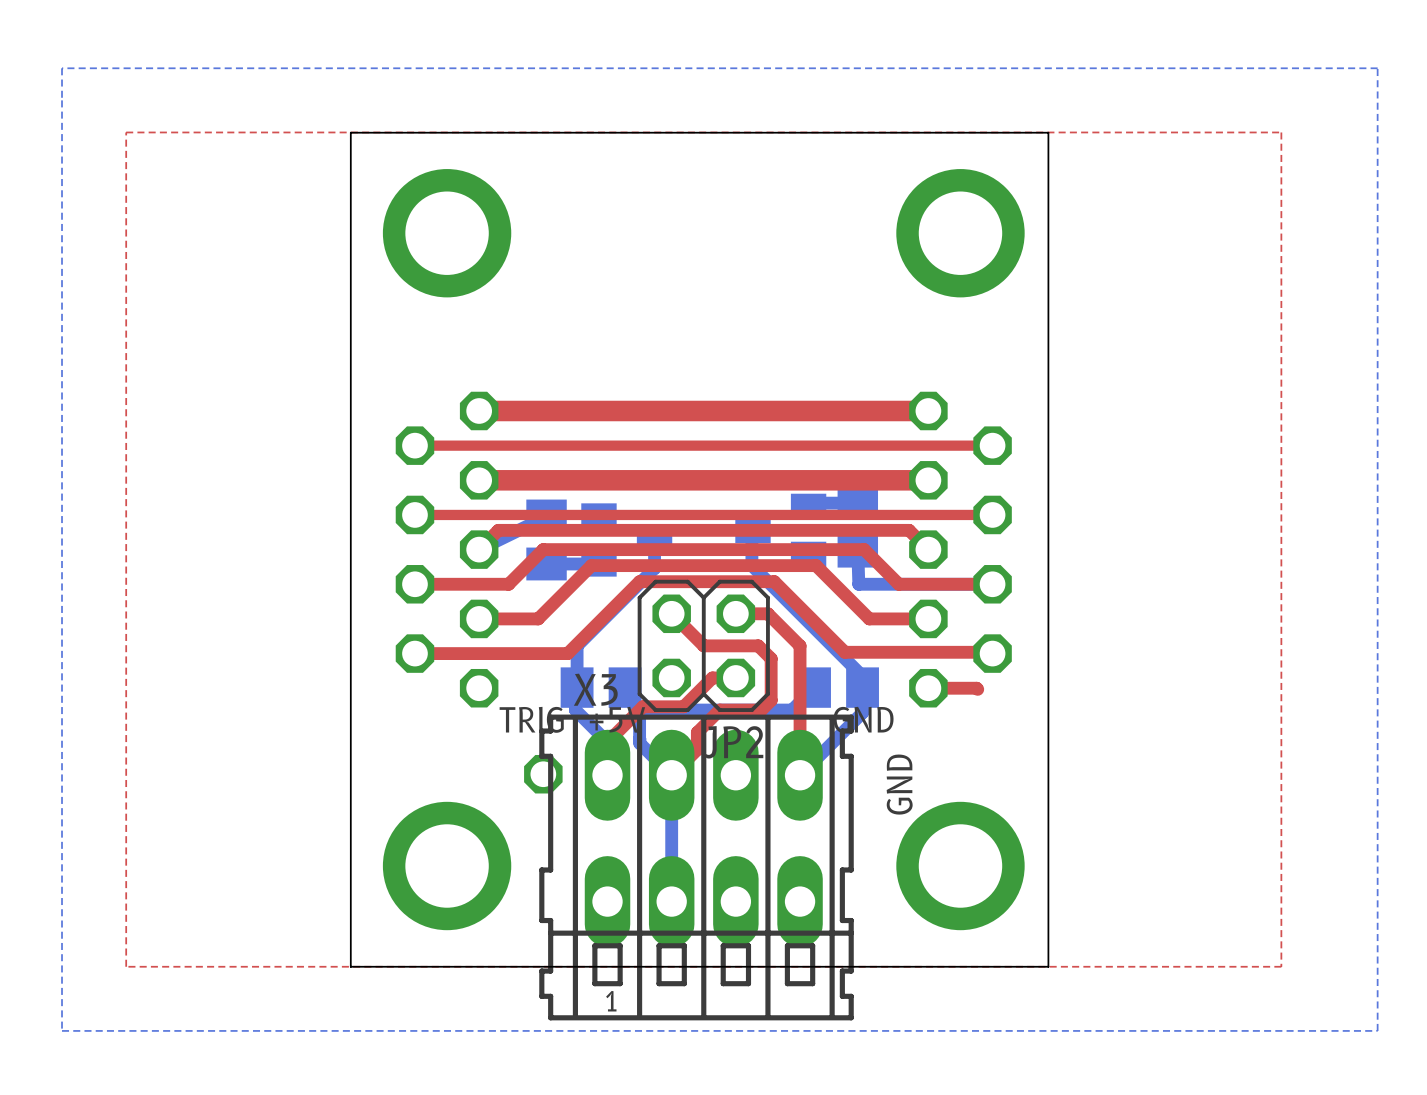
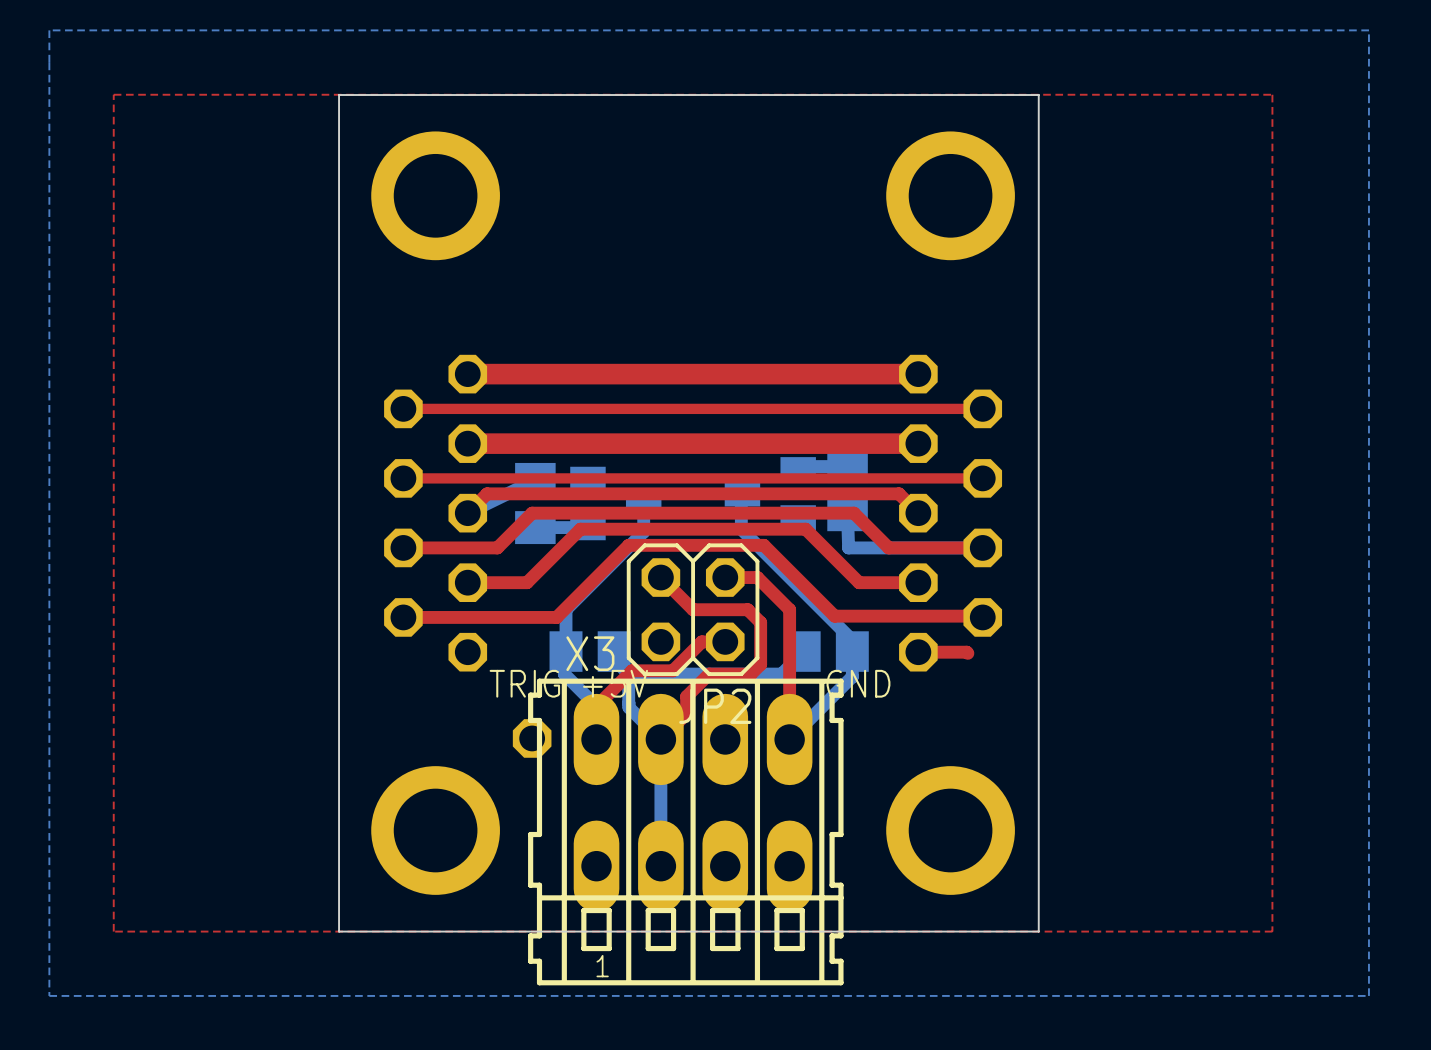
text: GND (899, 784) -> none

